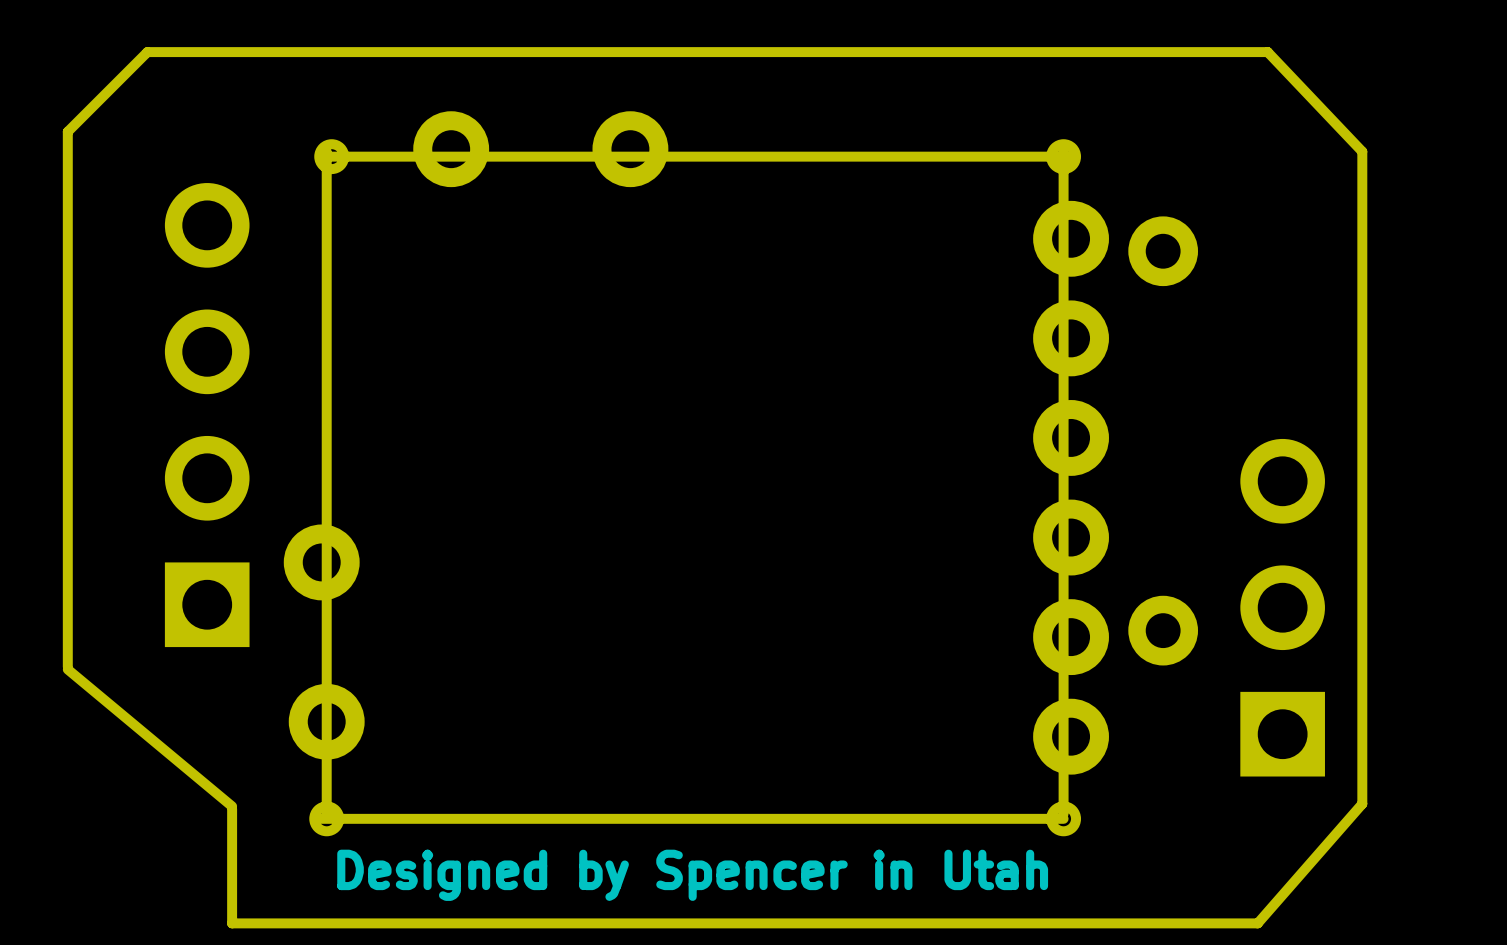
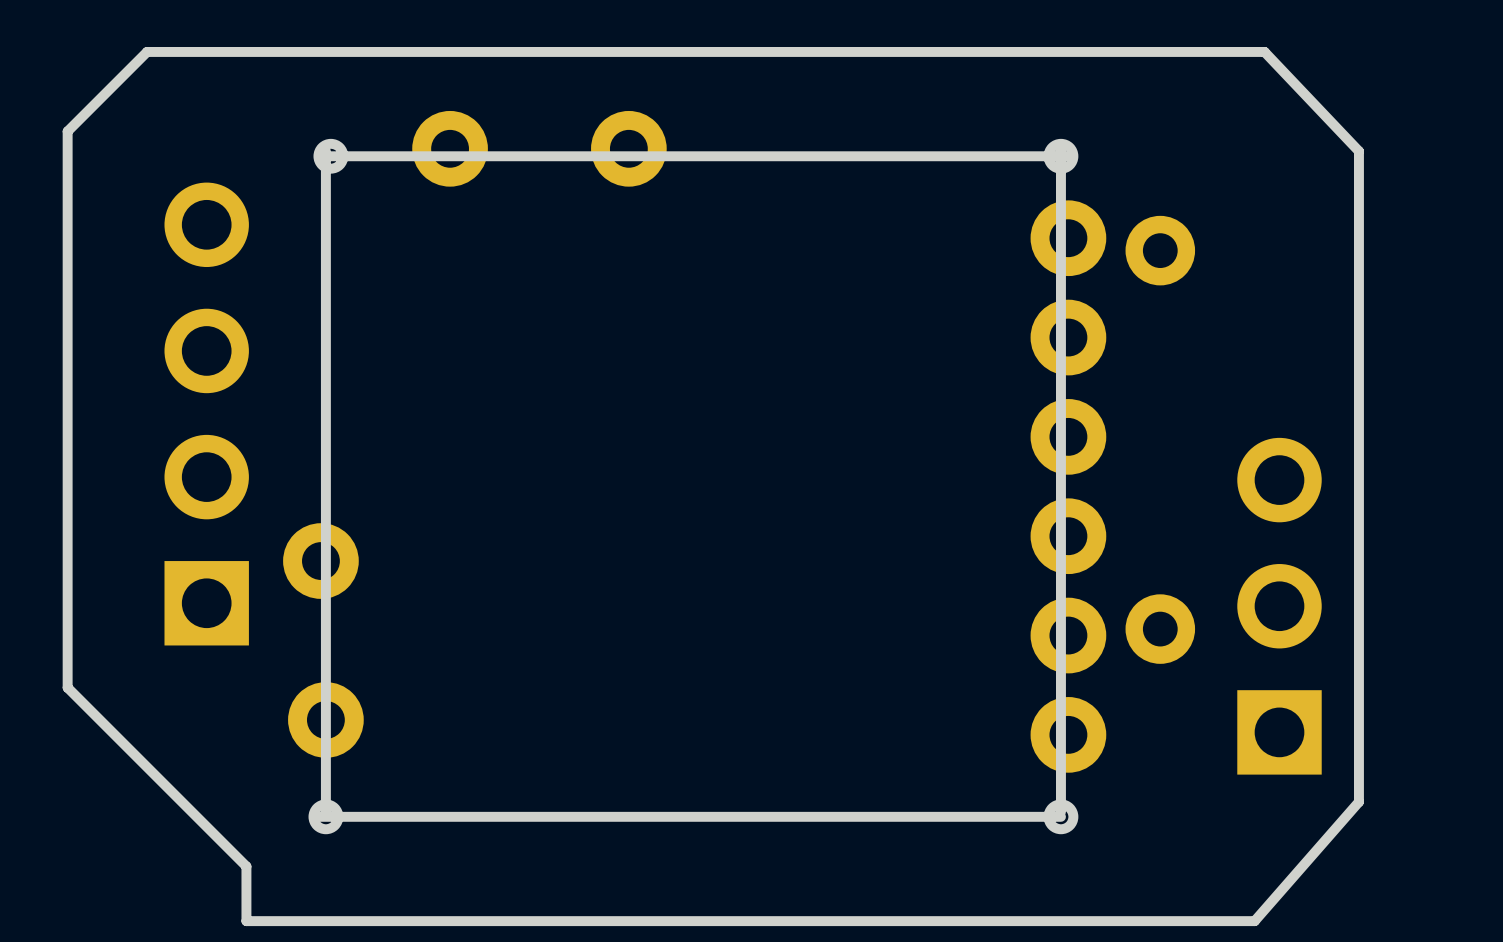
board edge: (67, 669) (232, 806) -> none
board edge: (232, 808) (232, 923) (247, 923) -> (67, 665) (67, 687) (246, 866) (246, 921)
text: Designed by Spencer in Utah (692, 875) -> none

